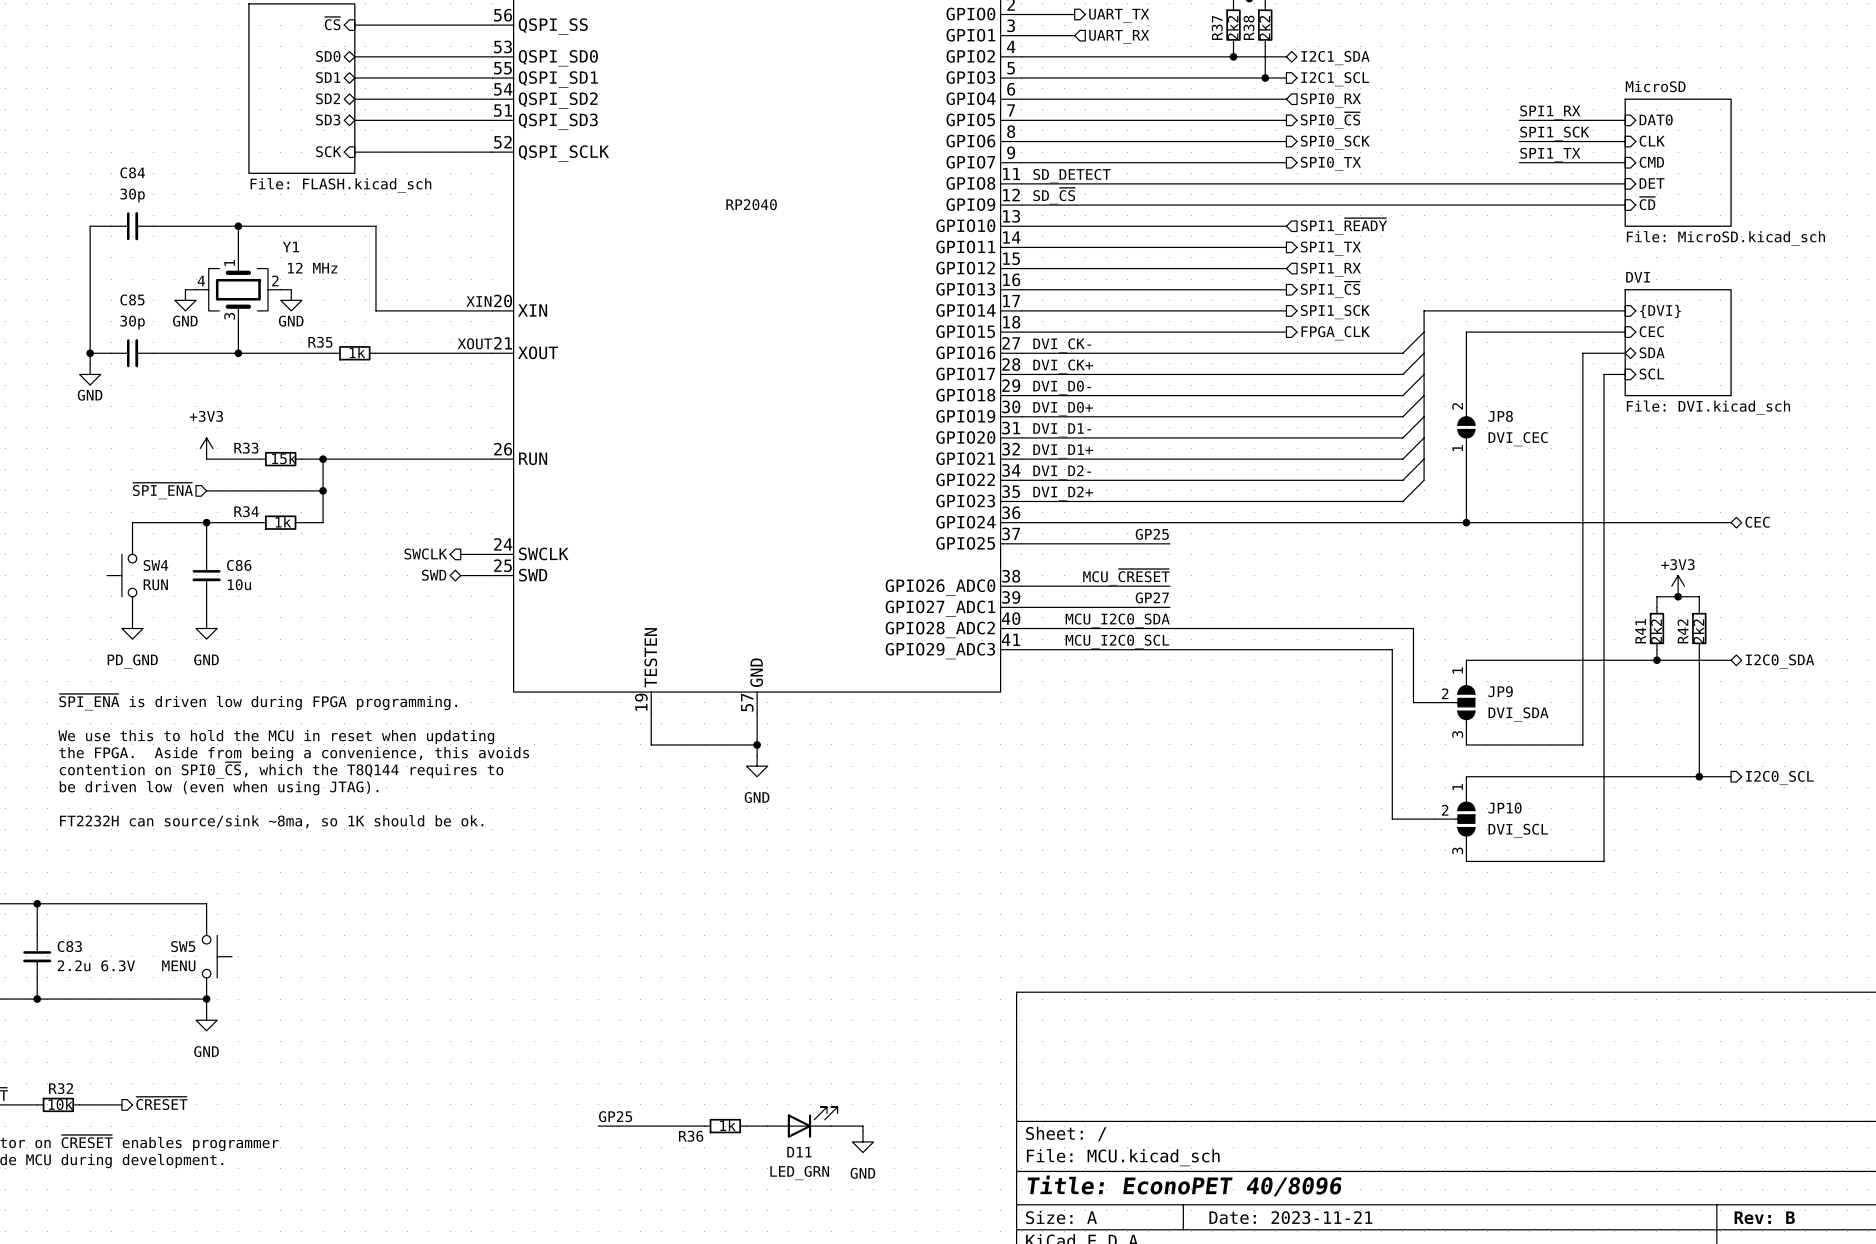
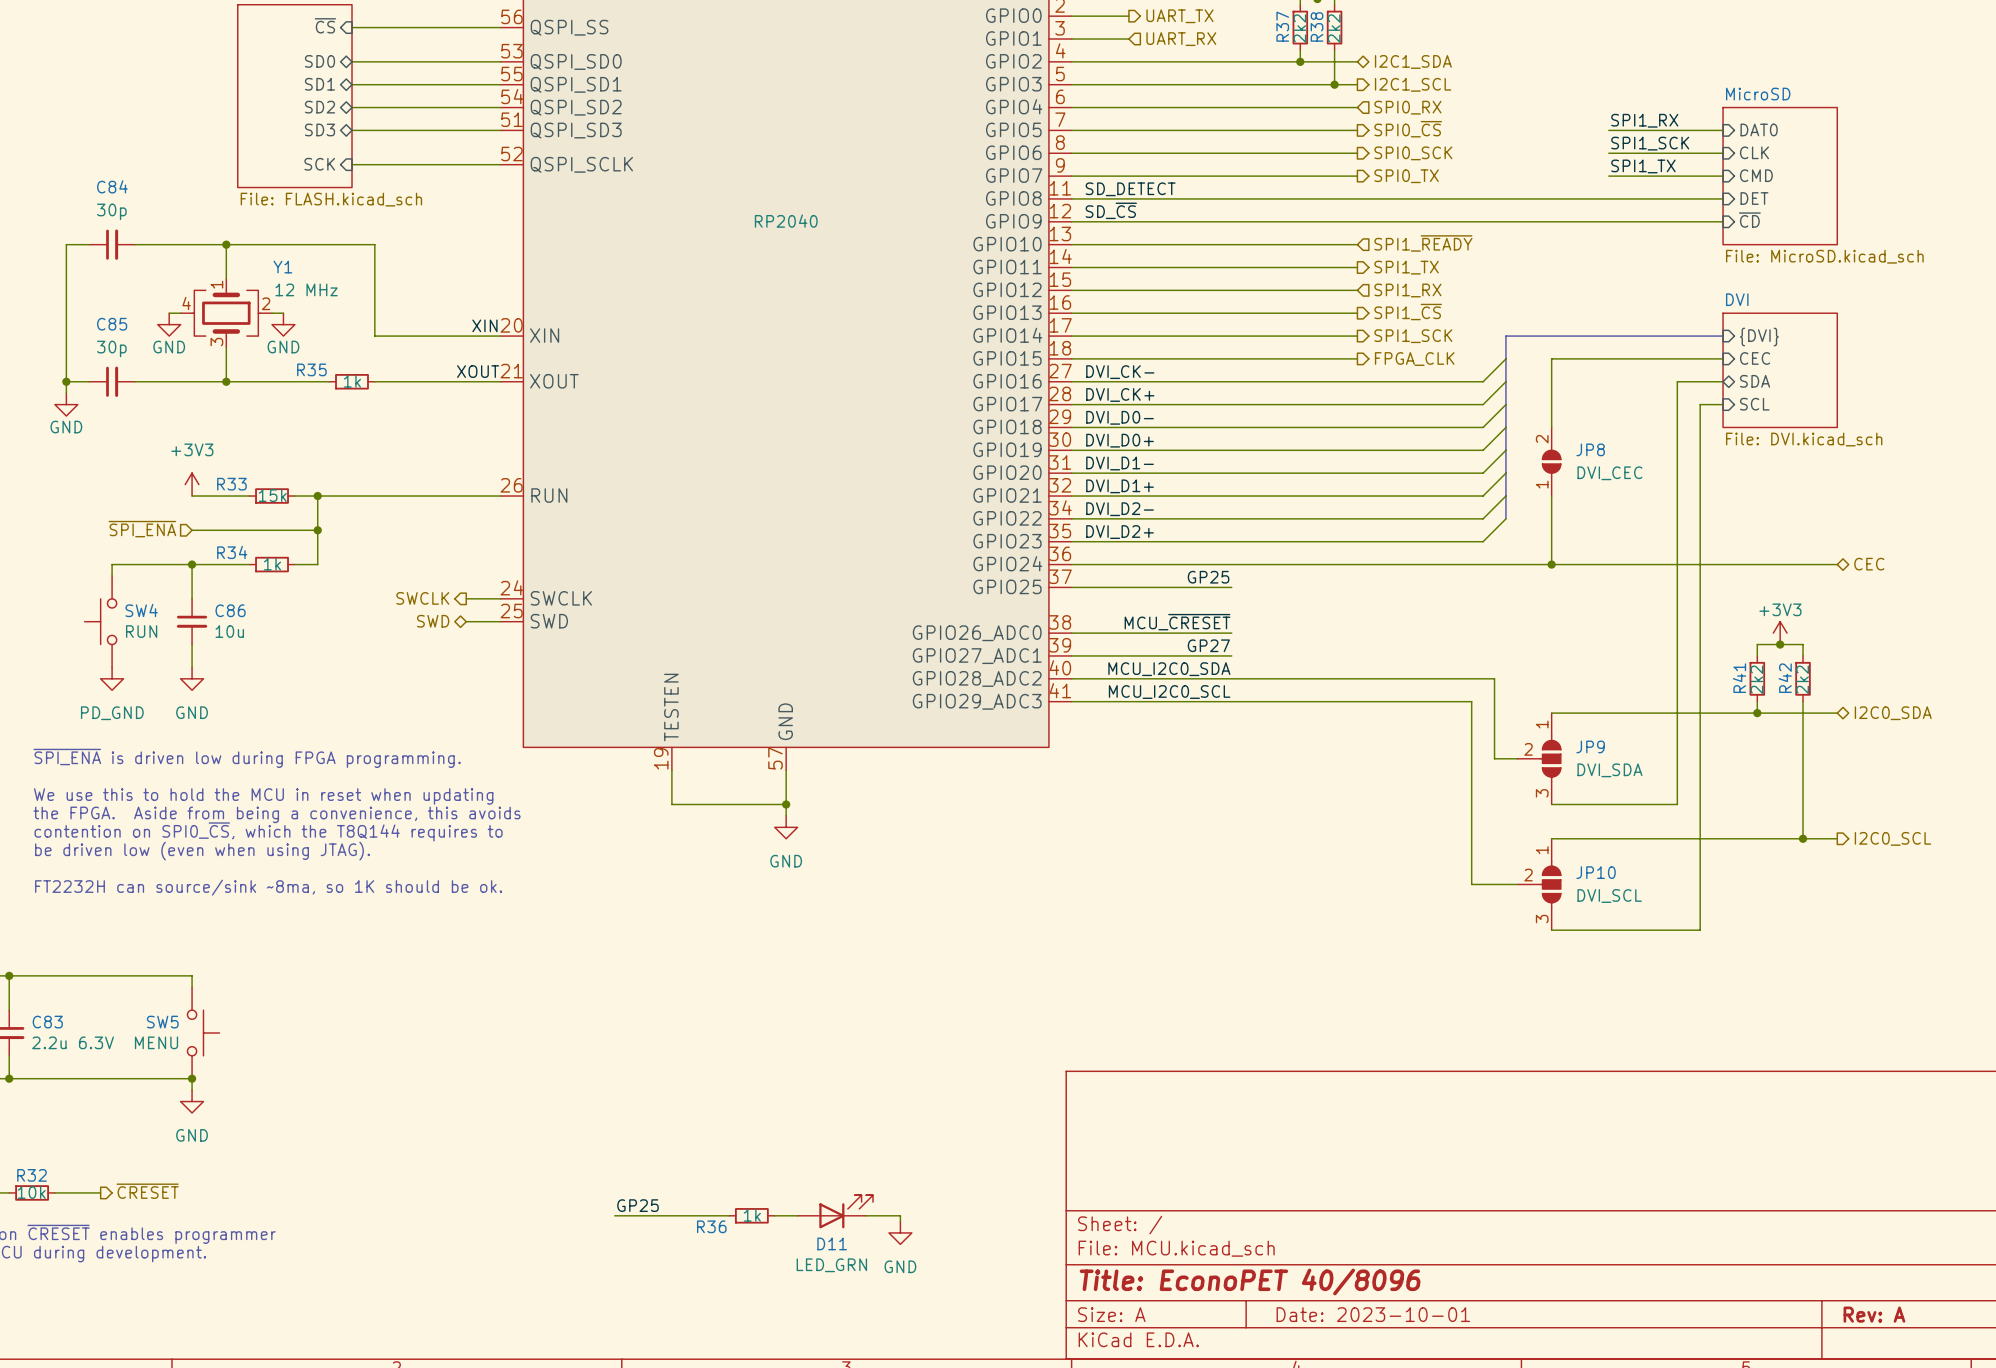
title block: Date: 2023-11-21 (1290, 1217) -> Date: 2023-10-01 (1373, 1314)
title block: Rev: B (1764, 1217) -> Rev: A (1874, 1314)

